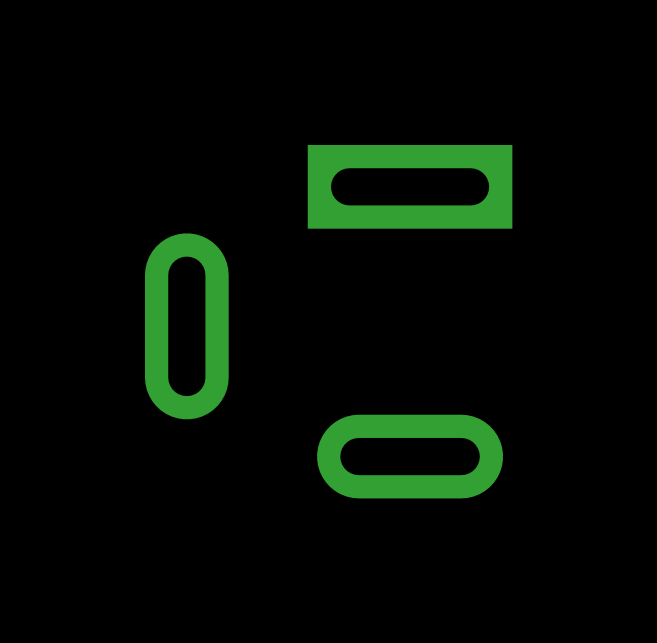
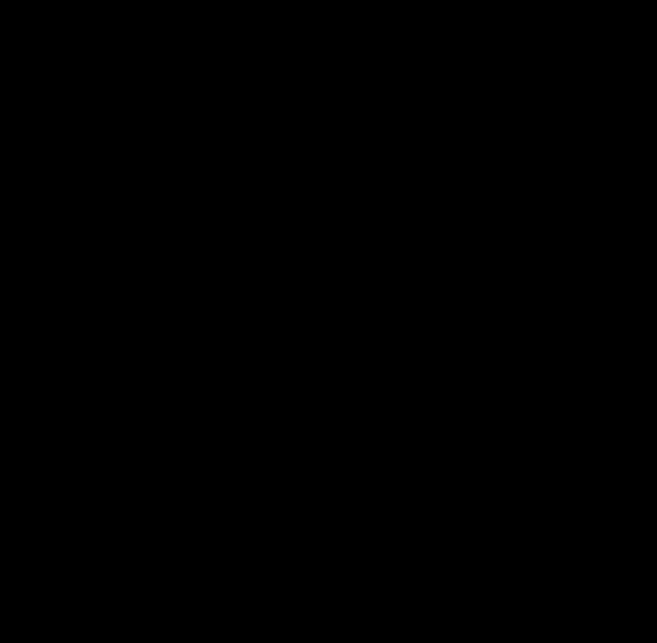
part: (328, 321) -> none

